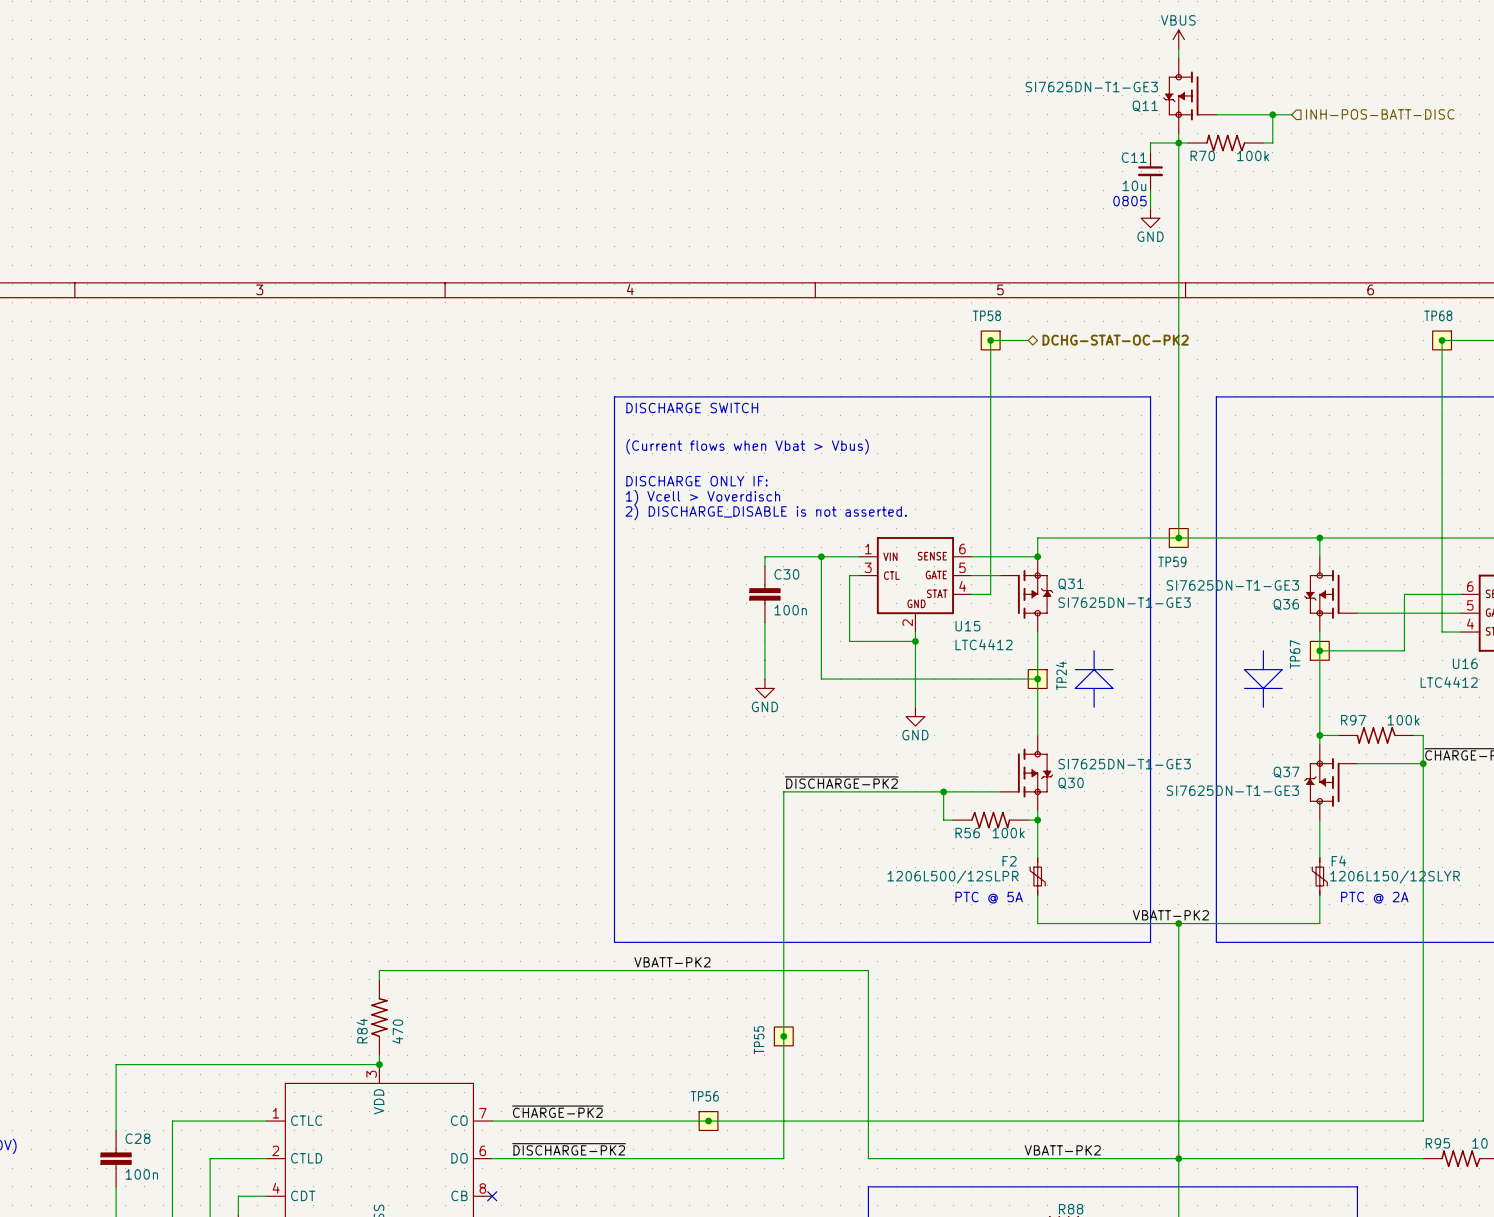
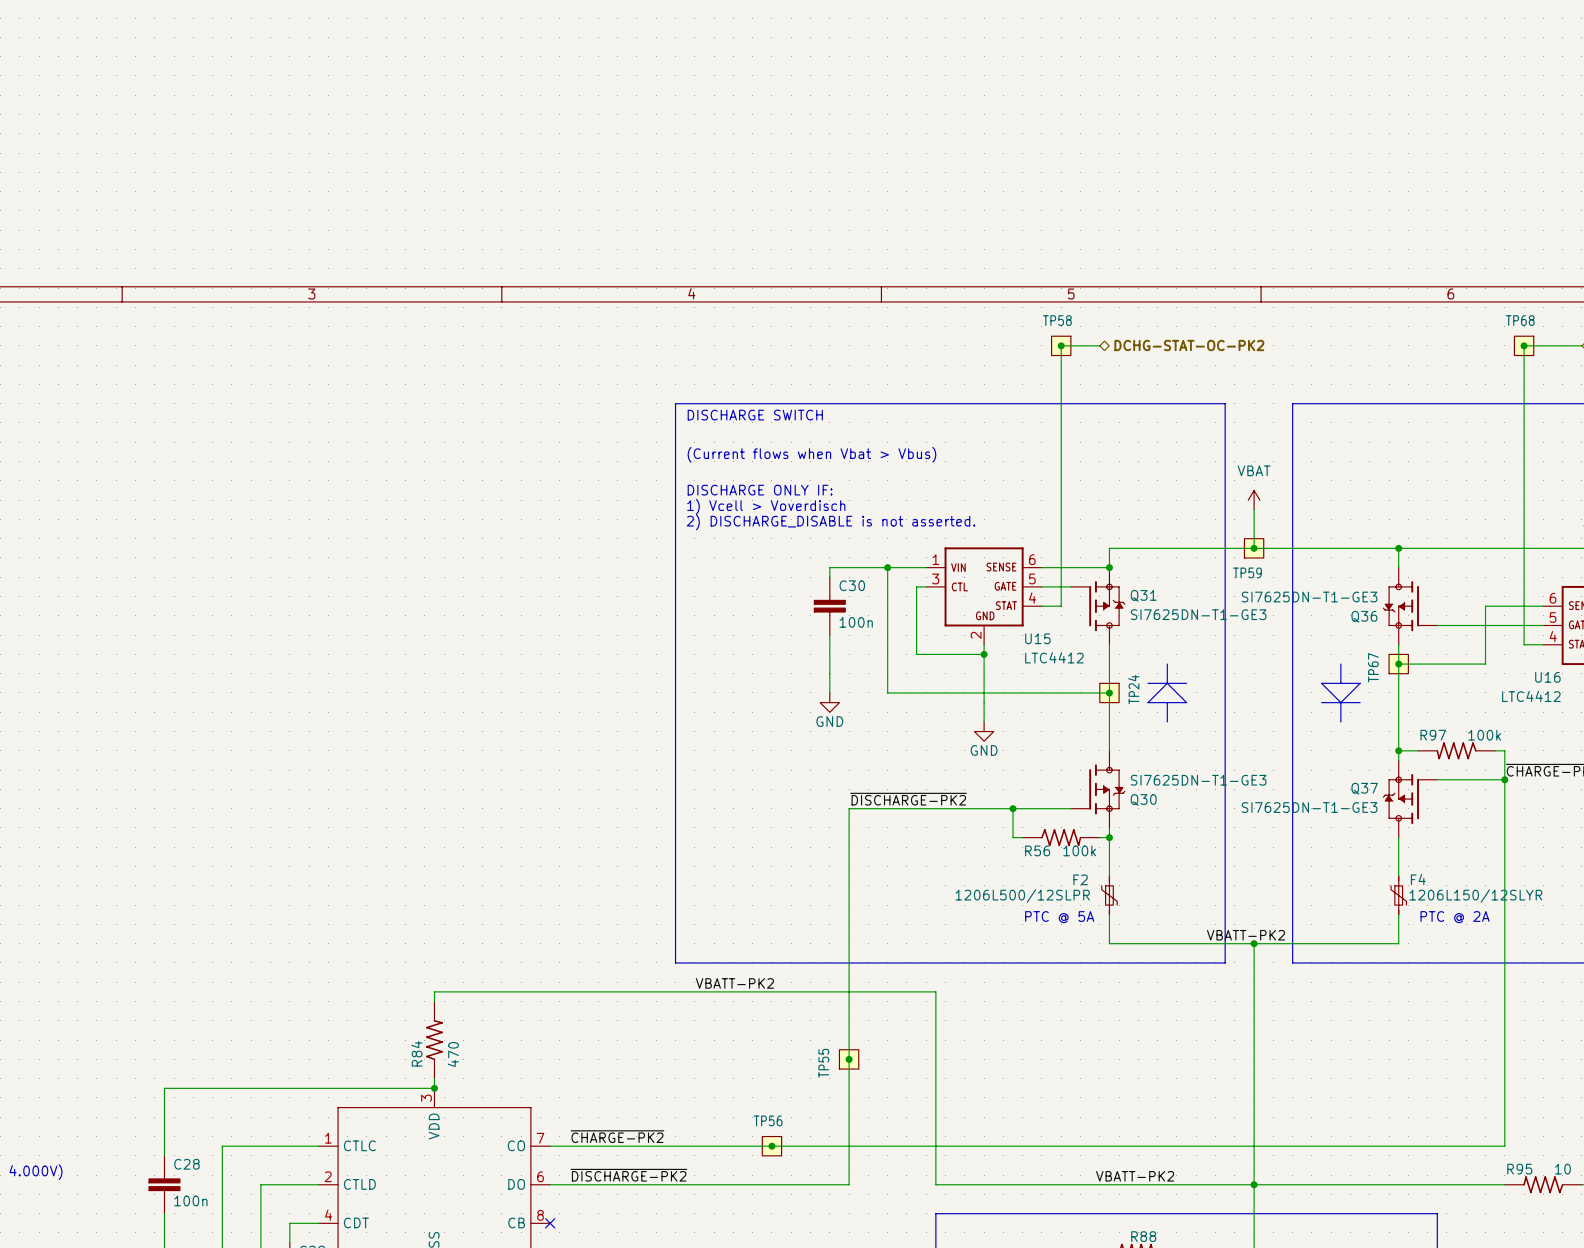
power symbol: VBUS (1178, 39) -> none
wire: (1178, 48) (1178, 58) -> none
Q11: SI7625DN-T1-GE3 (1189, 95) -> none
wire: (1216, 114) (1291, 114) -> none
wire: (1272, 114) (1272, 142) (1263, 142) -> none
junction: (1272, 114) -> none
hierarchical label: INH-POS-BATT-DISC (1380, 114) -> none
wire: (1178, 133) (1178, 500) -> none
junction: (1178, 142) -> none
wire: (1188, 142) (1150, 142) (1150, 152) -> none
R70: 100k (1225, 142) -> none
C11: 10u (1150, 171) -> none
wire: (1150, 190) (1150, 208) -> none
text: 0805 (1130, 201) -> none
power symbol: GND (1150, 218) -> none
power symbol: none -> VBAT (1254, 500)

